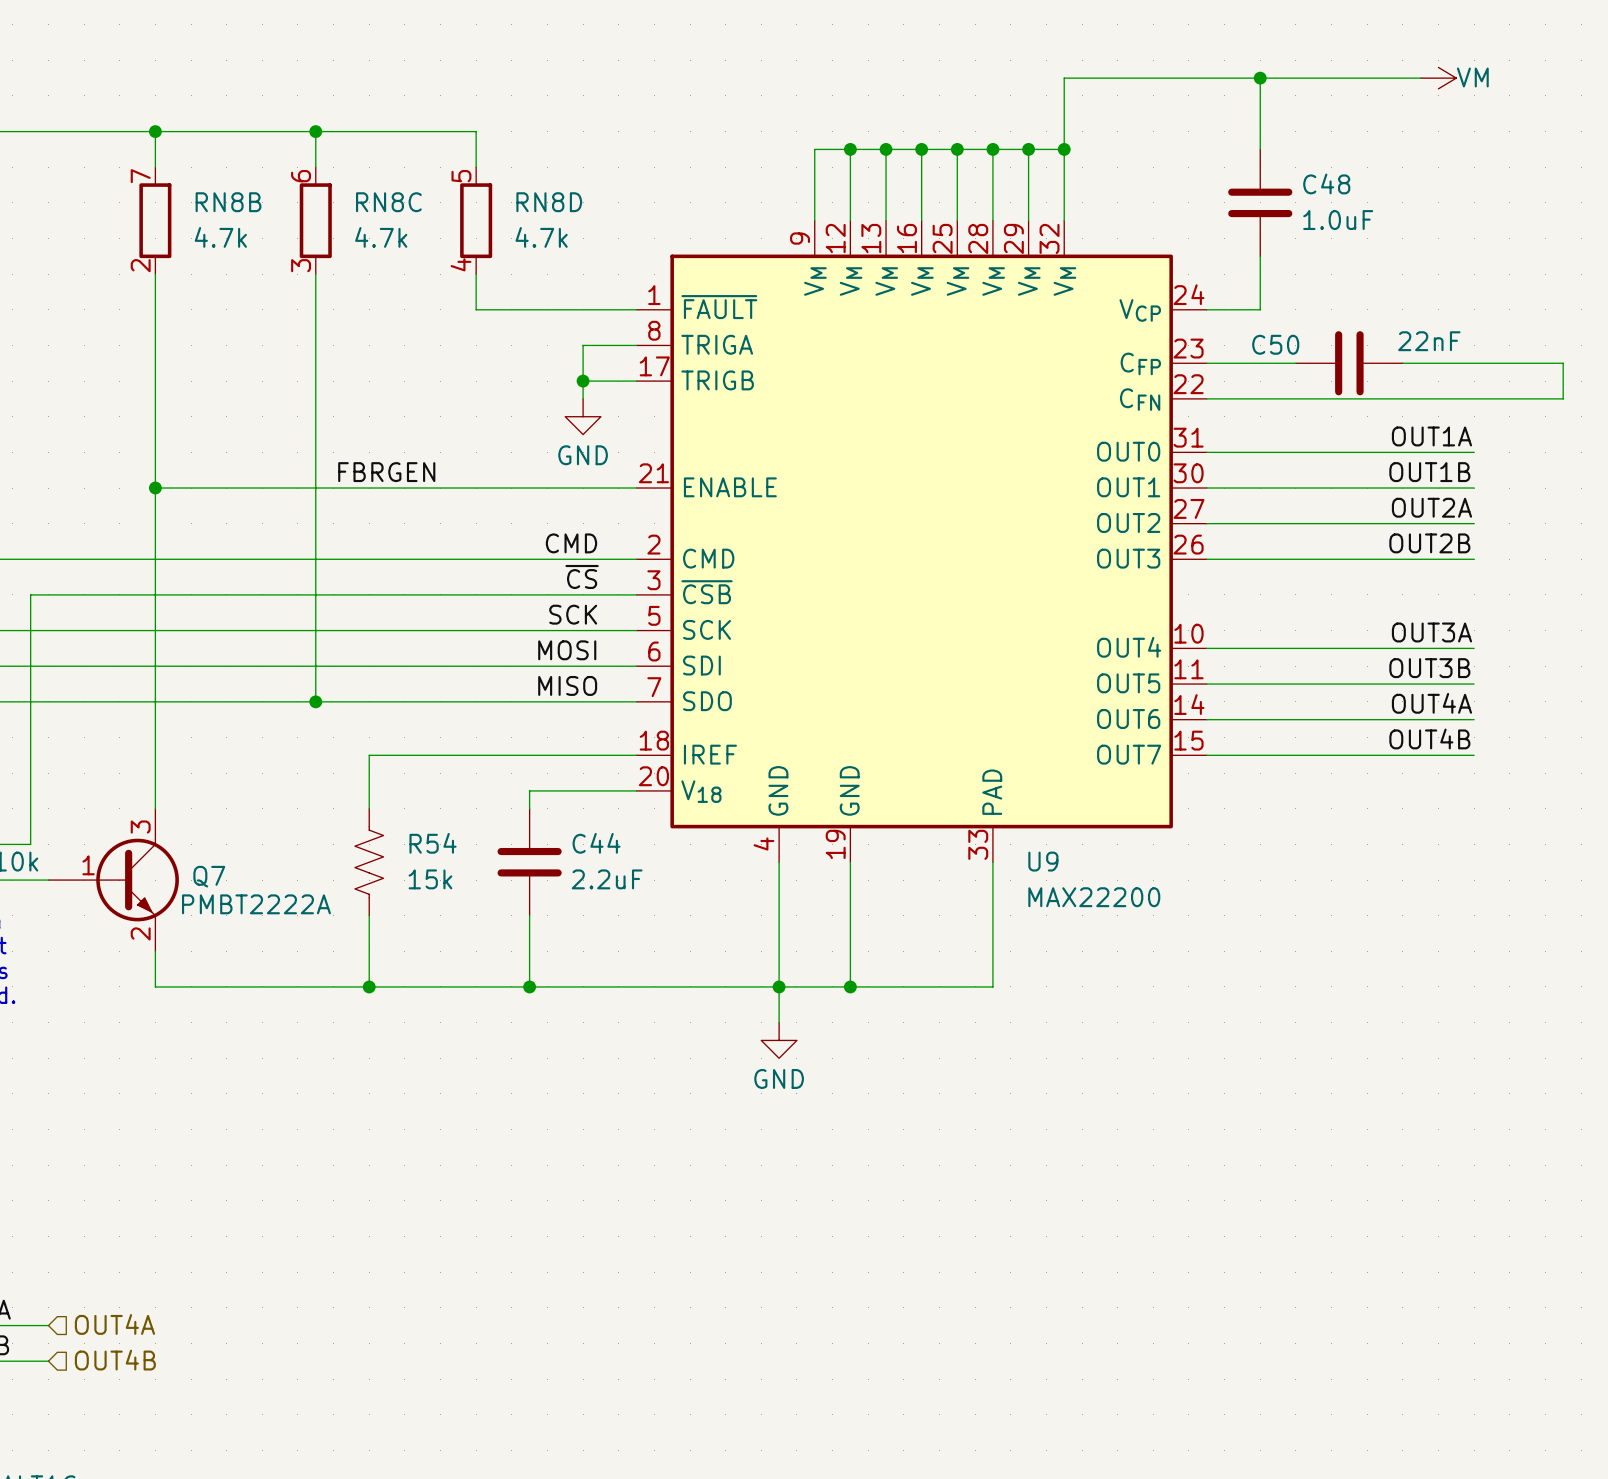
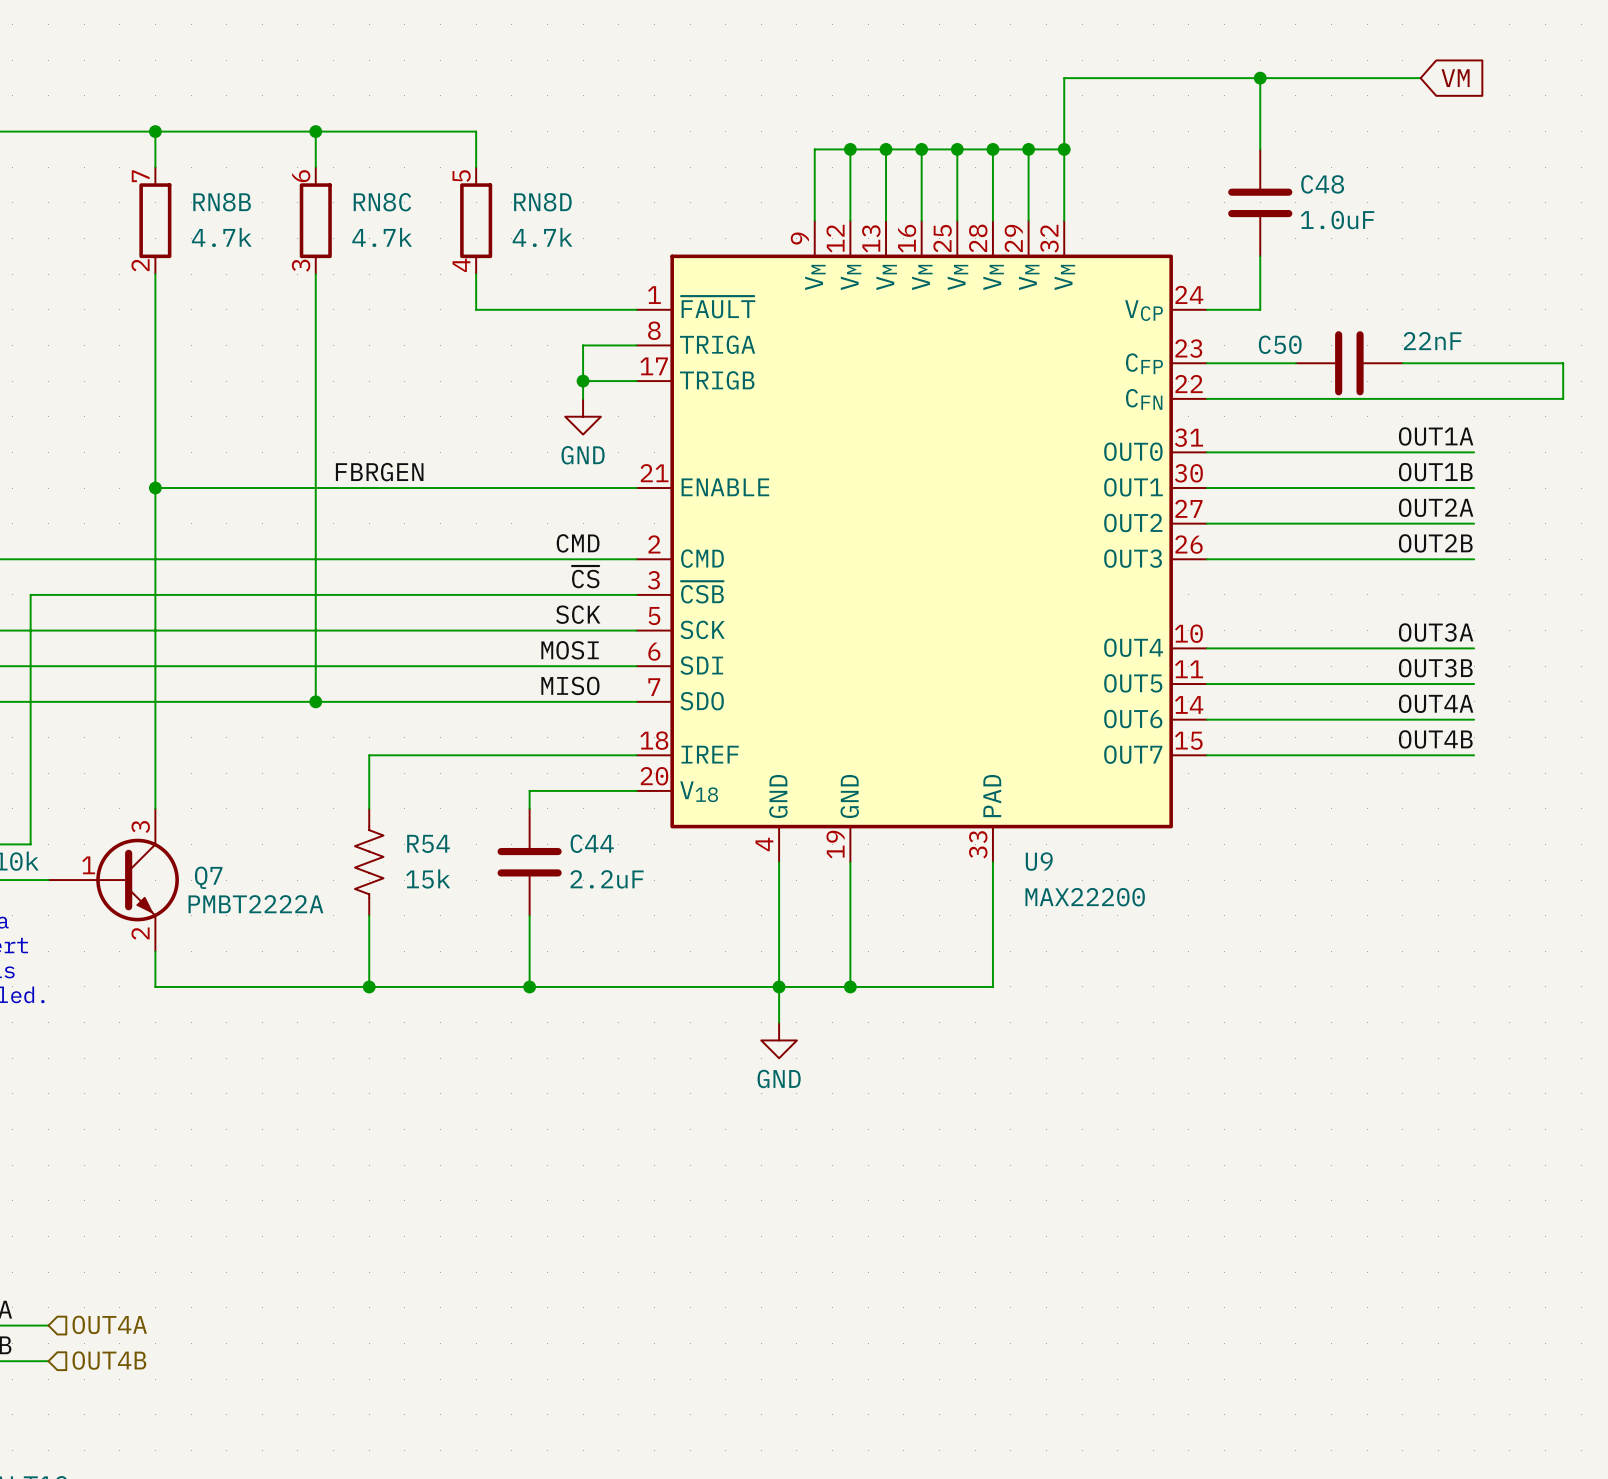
power symbol: VM (1438, 78) -> none
global label: none -> VM (1455, 78)

